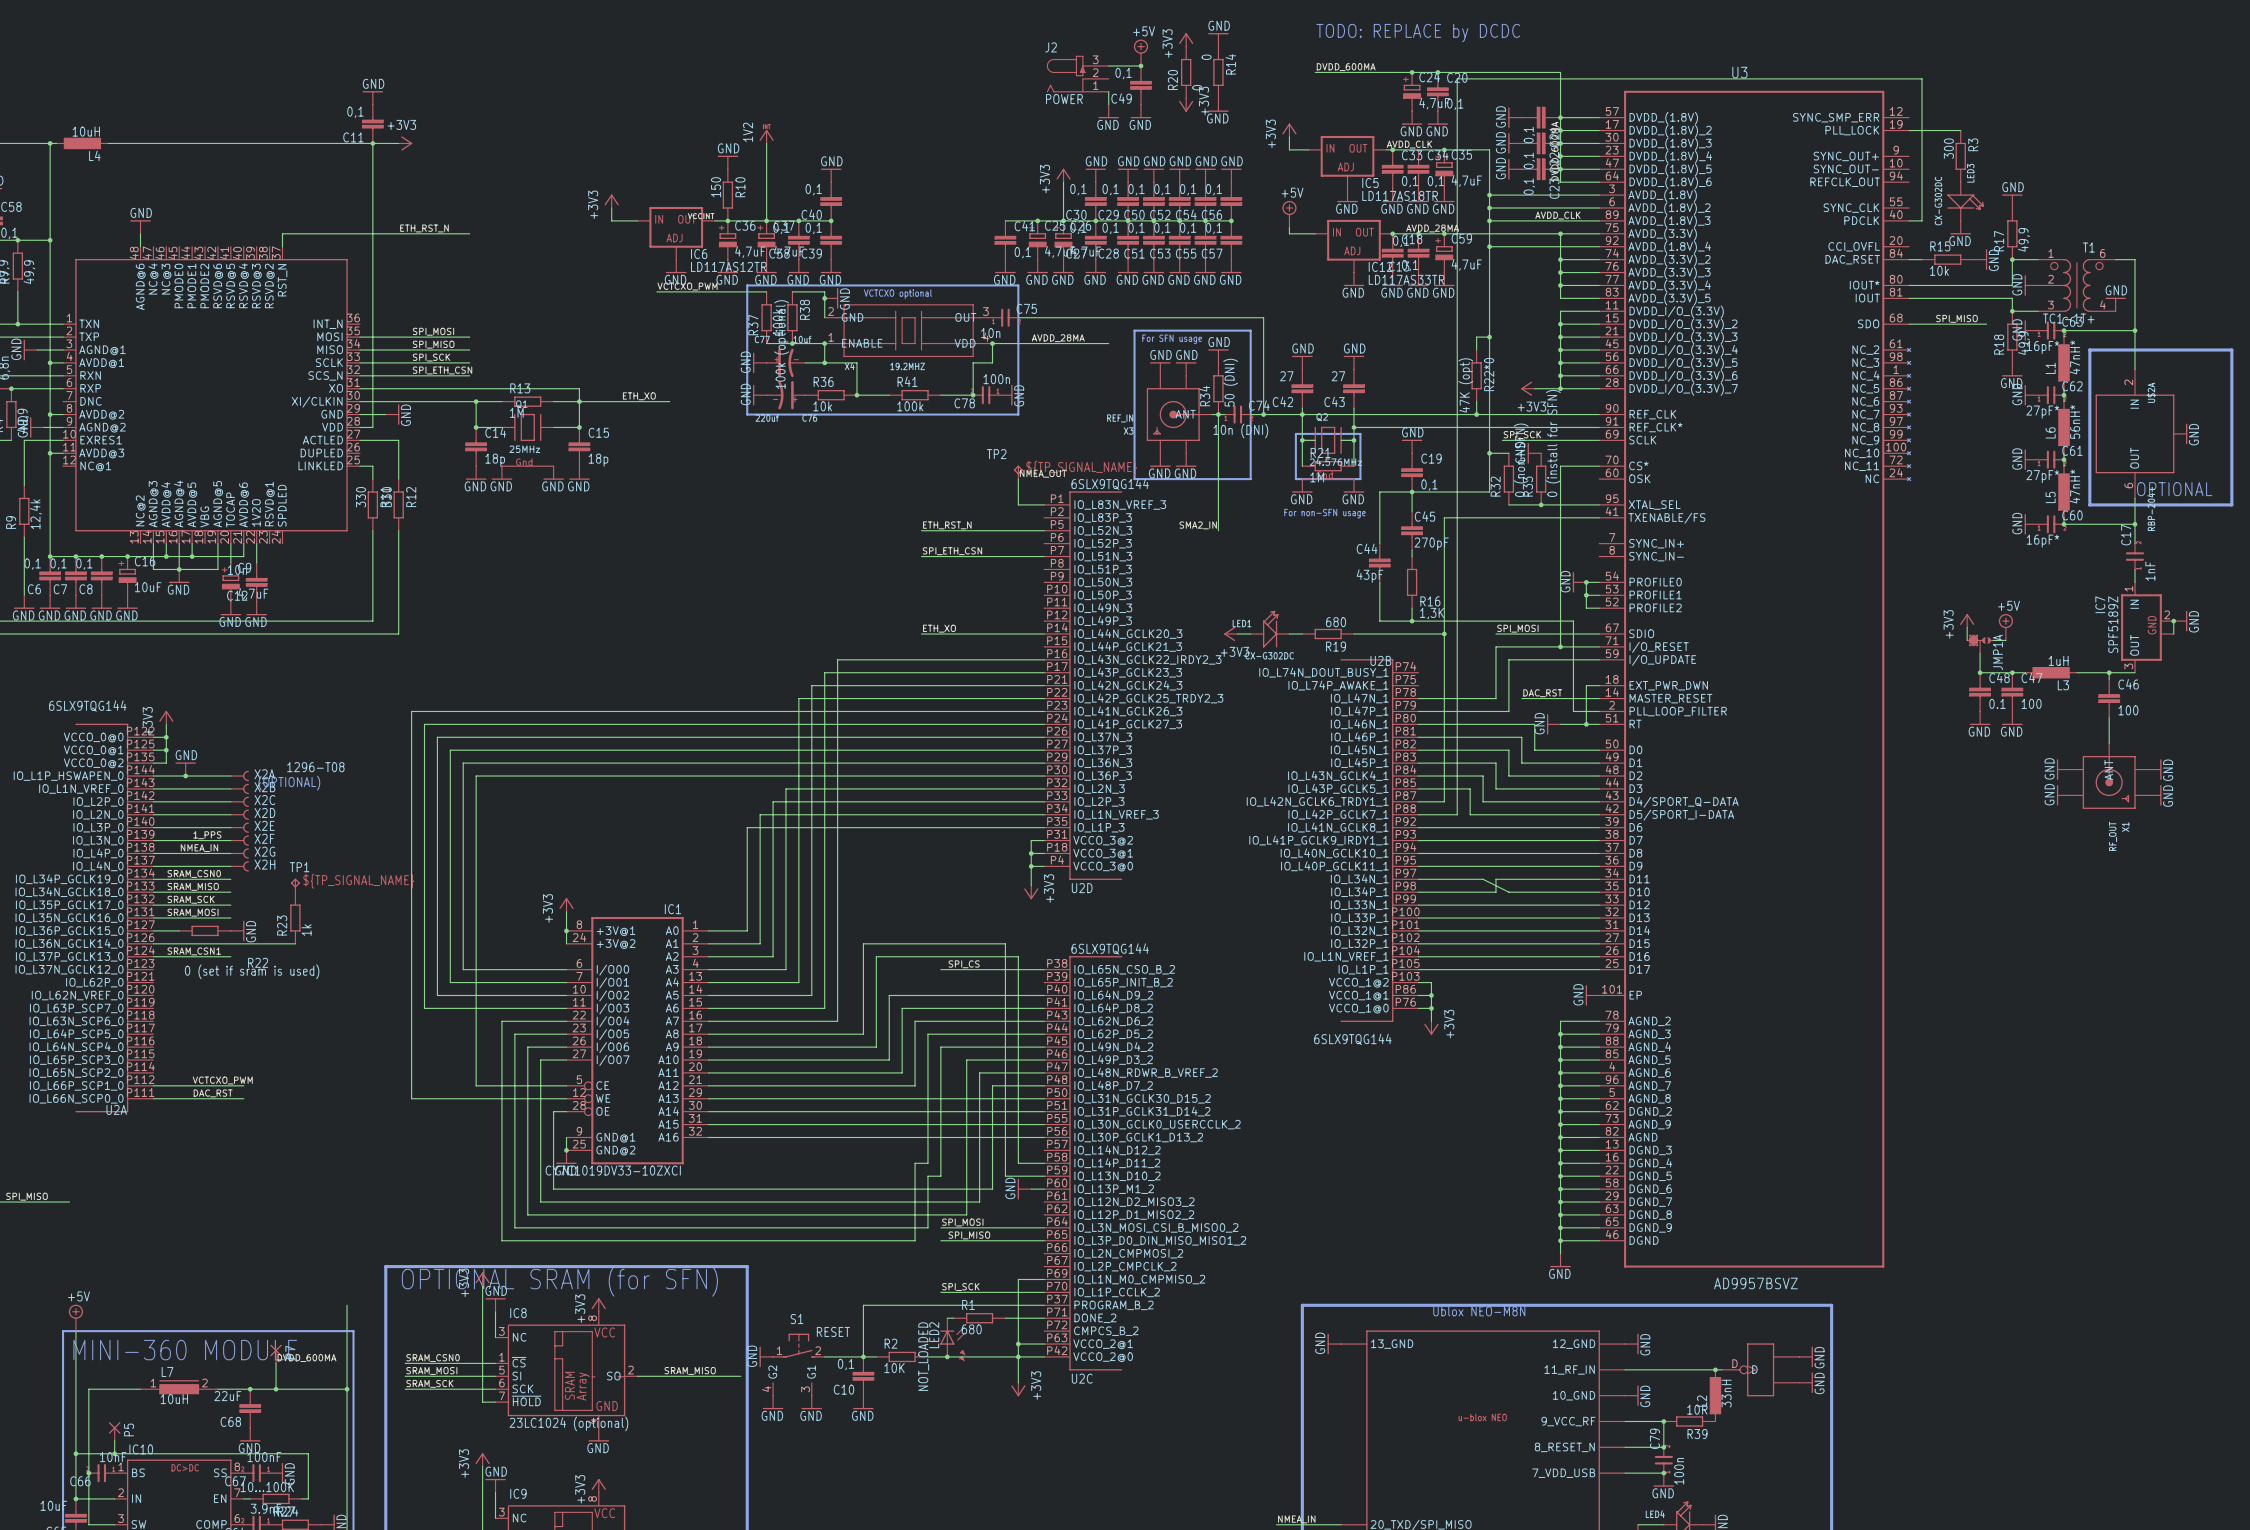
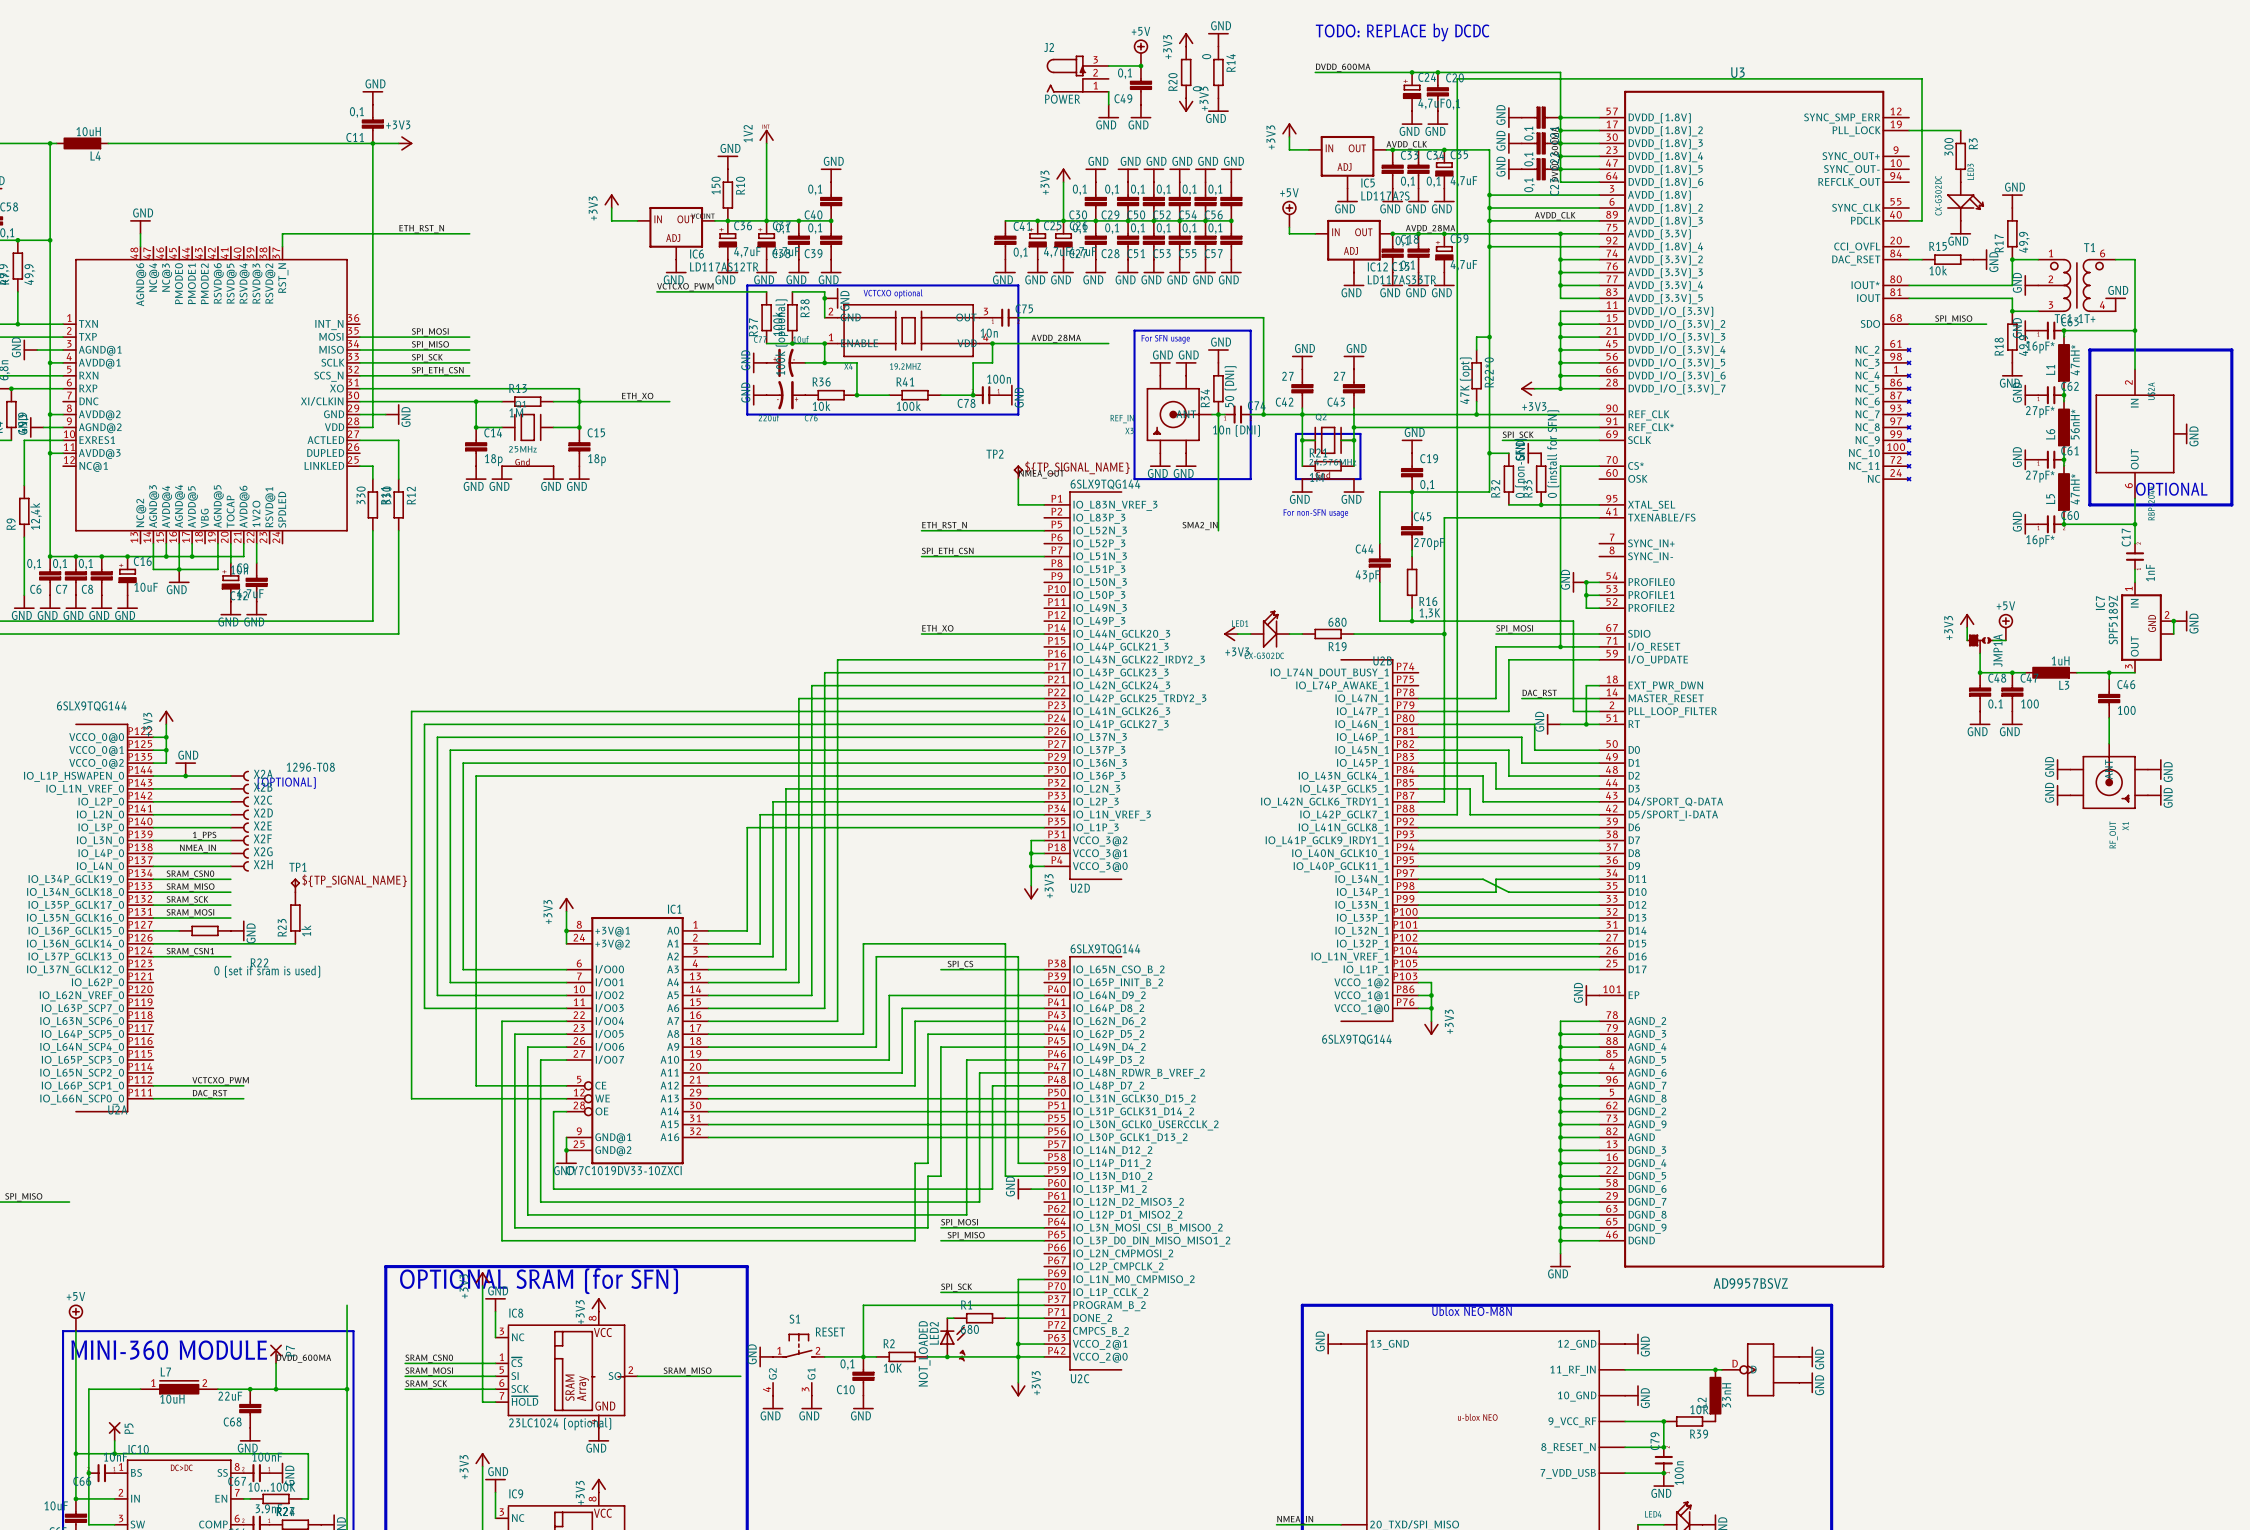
IC5 value: LD117AS18TR (1400, 195) -> LD117A?S (1385, 195)

